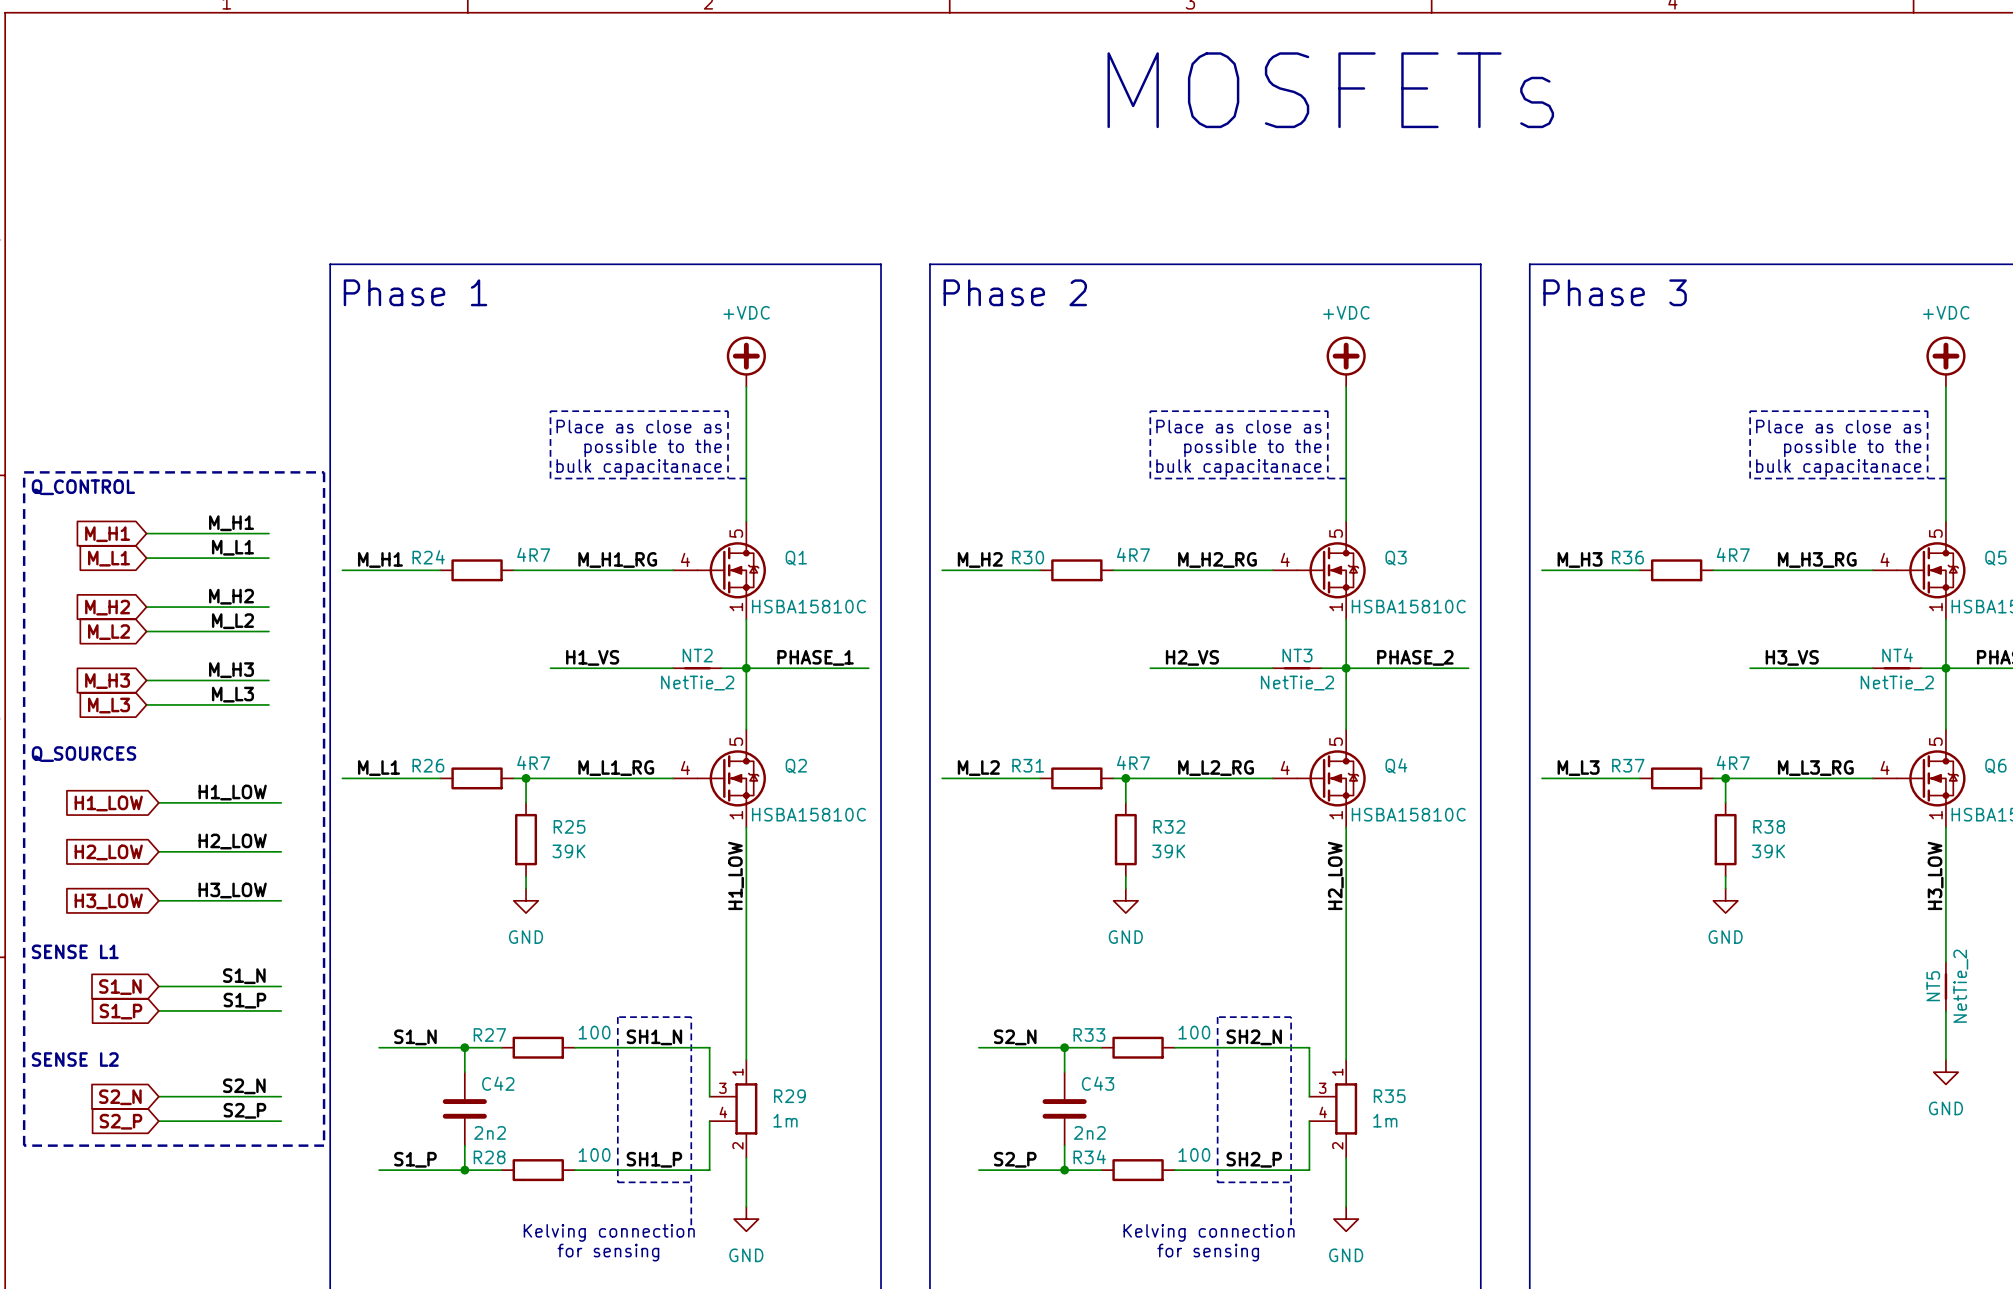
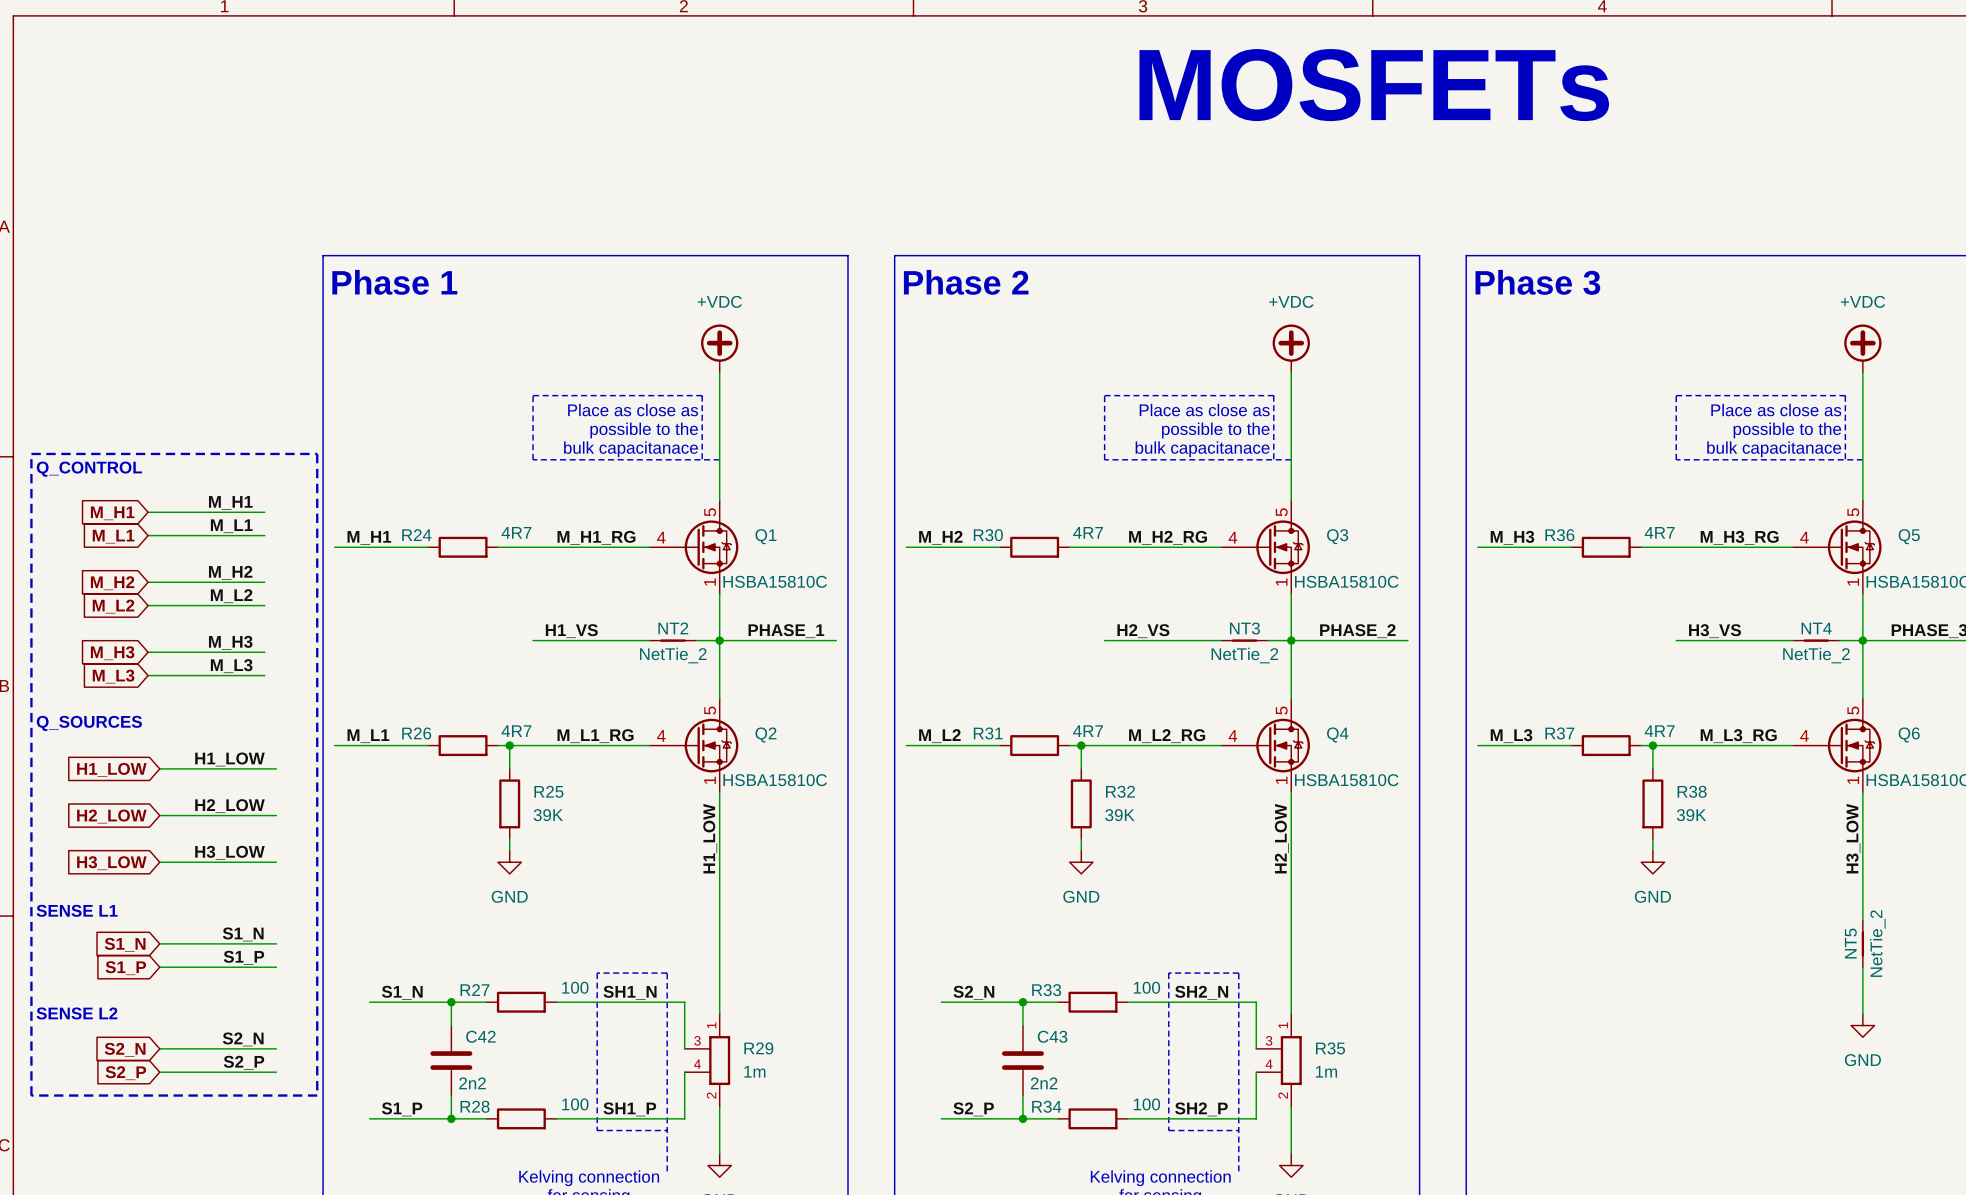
text position: MOSFETs (1330, 90) -> MOSFETs (1374, 85)

